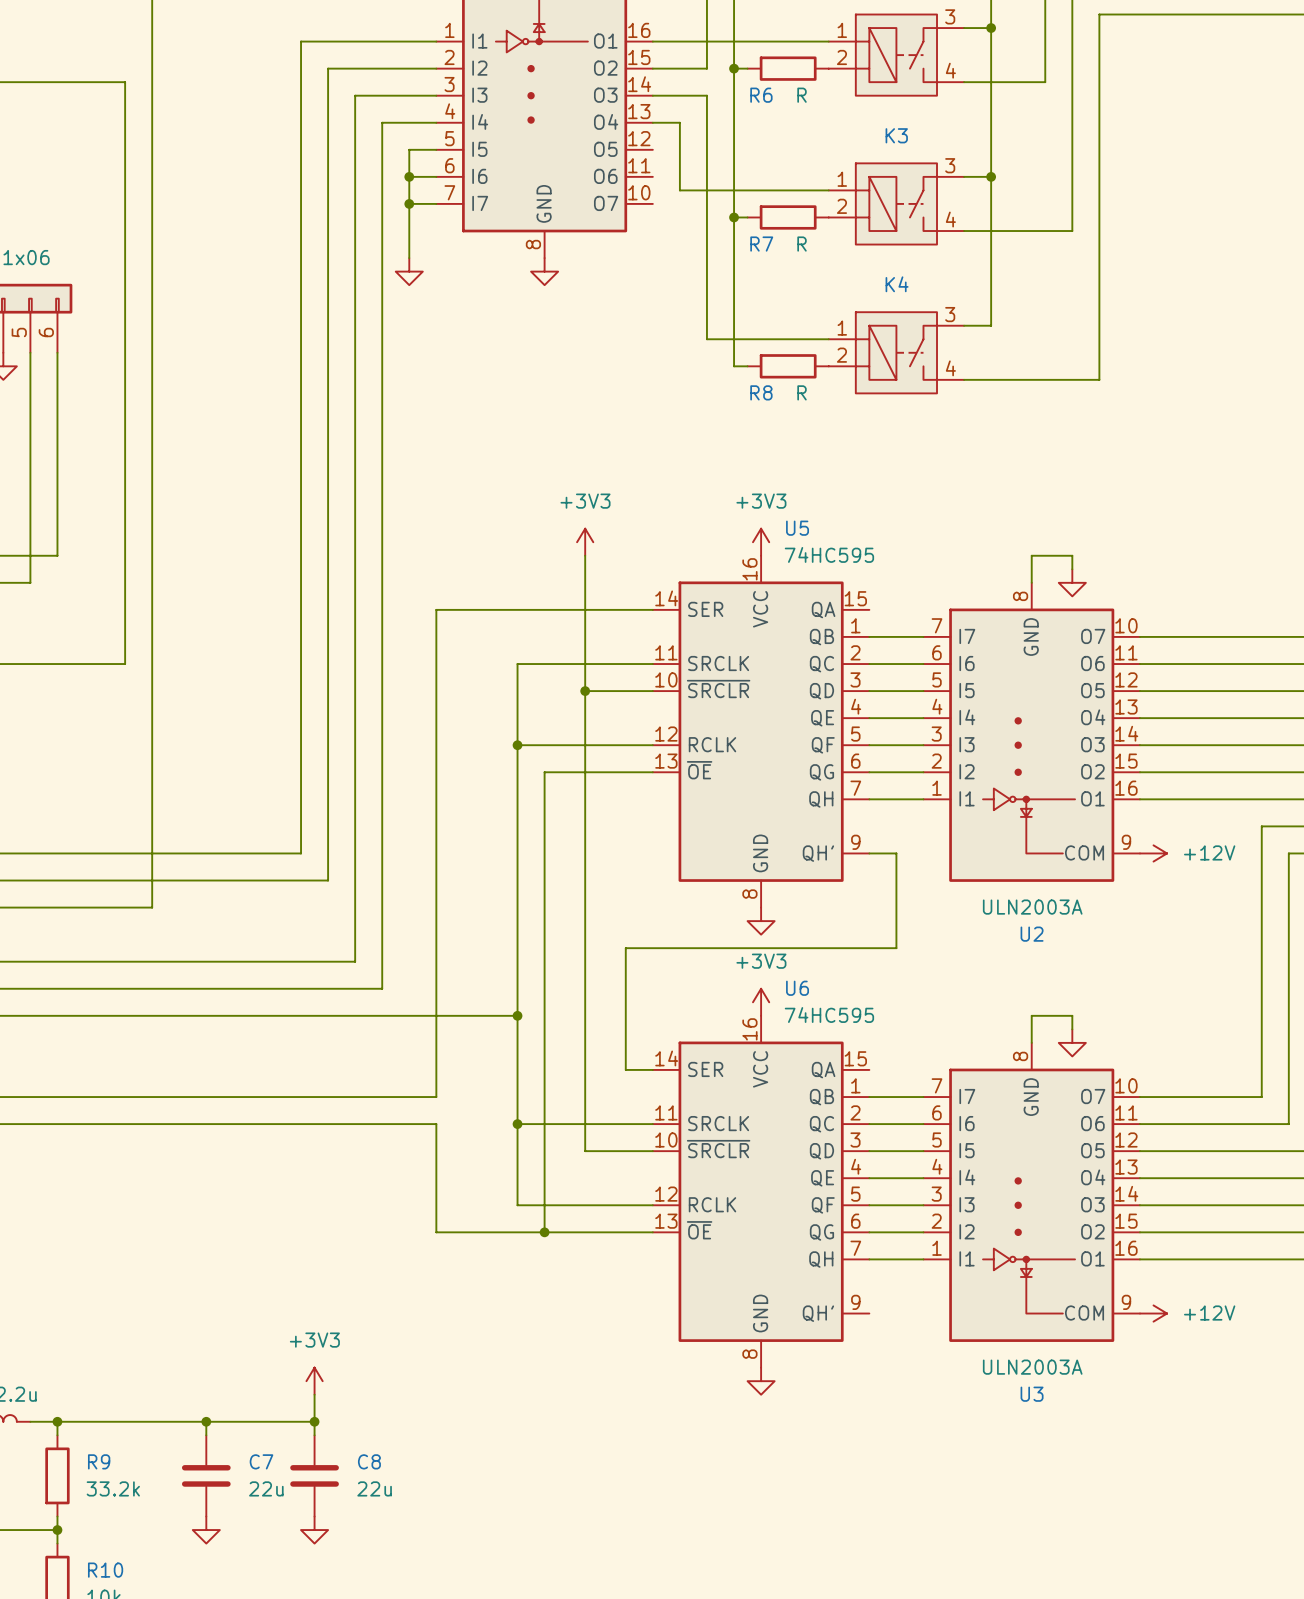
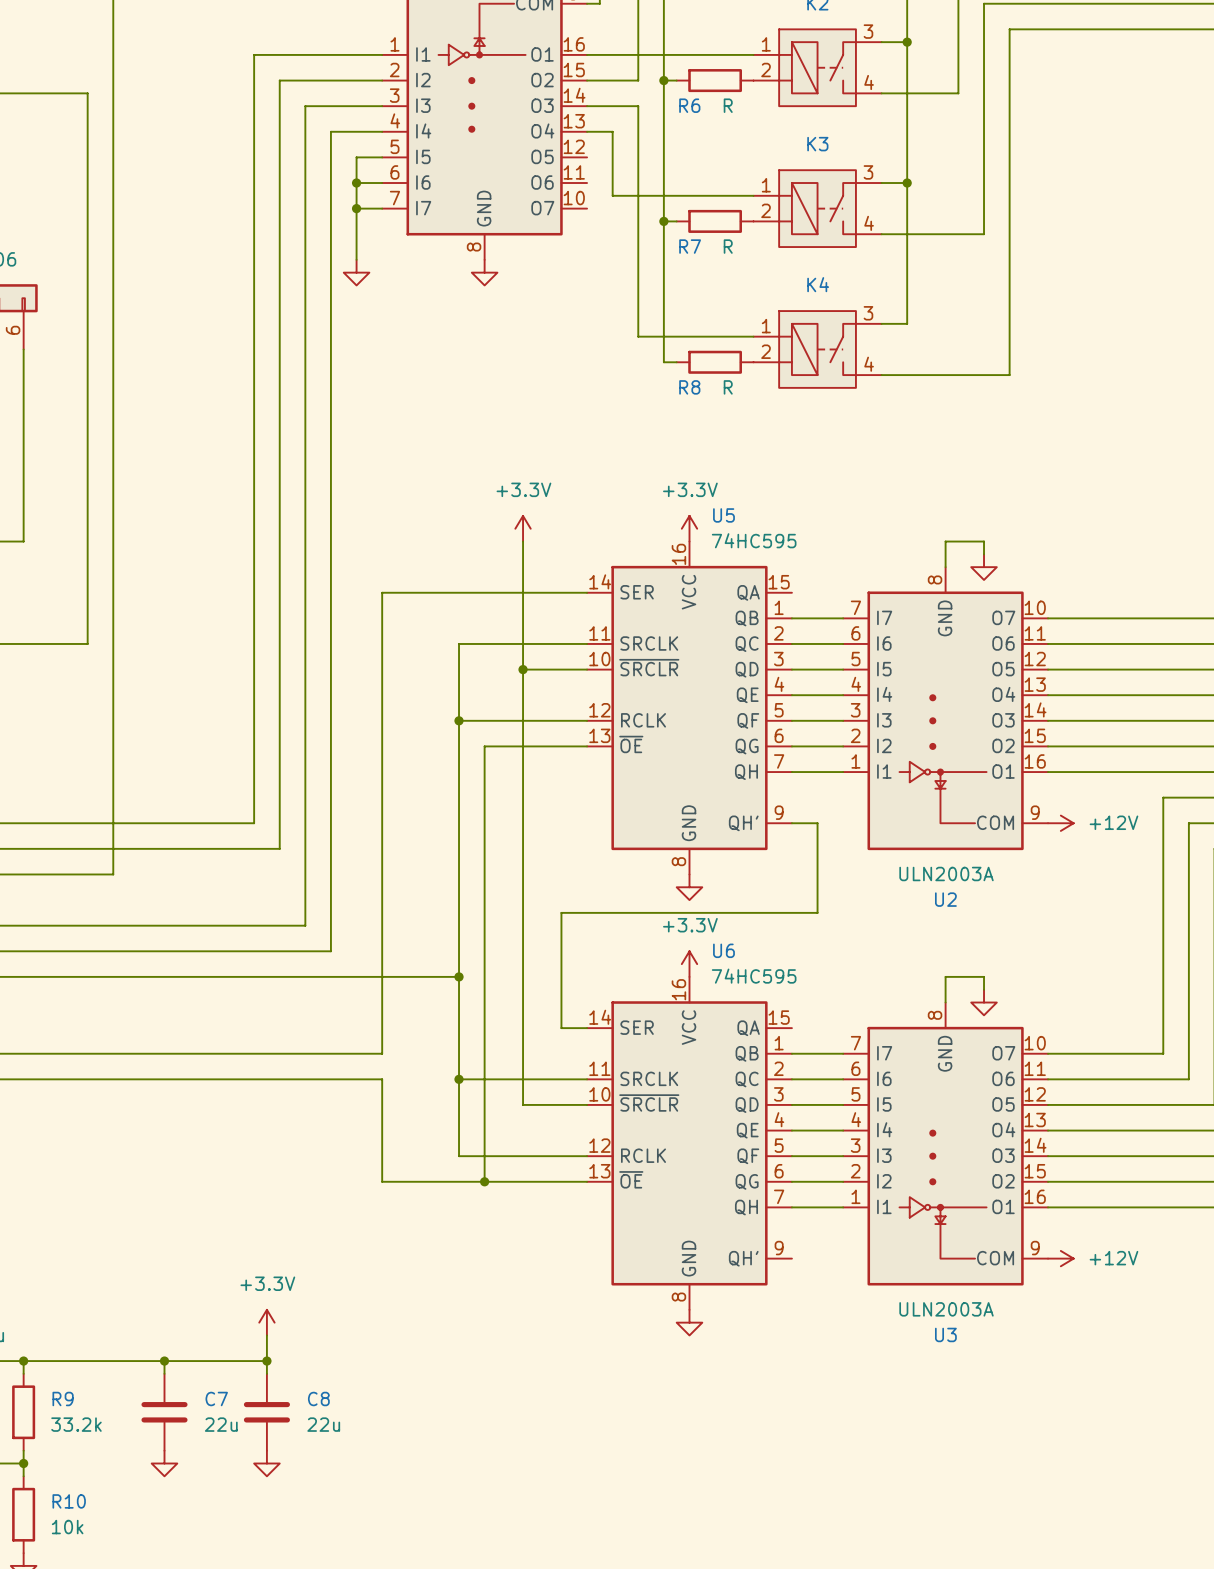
power symbol: +3V3 (585, 542) -> +3.3V (523, 528)
power symbol: +3V3 (761, 542) -> +3.3V (689, 528)
power symbol: +3V3 (761, 1002) -> +3.3V (689, 964)
power symbol: +3V3 (314, 1381) -> +3.3V (266, 1322)

